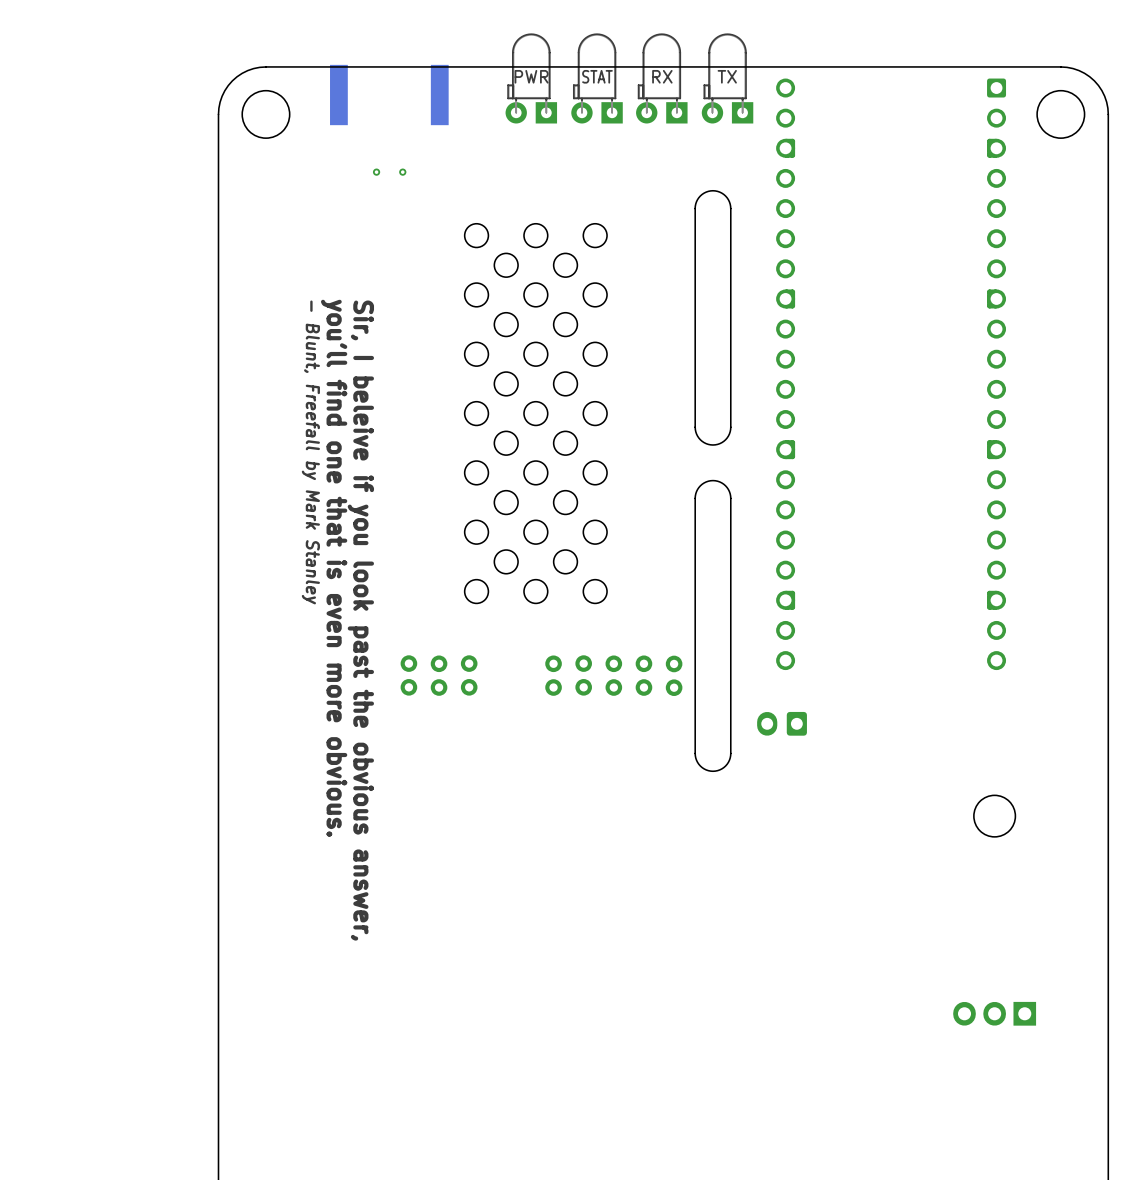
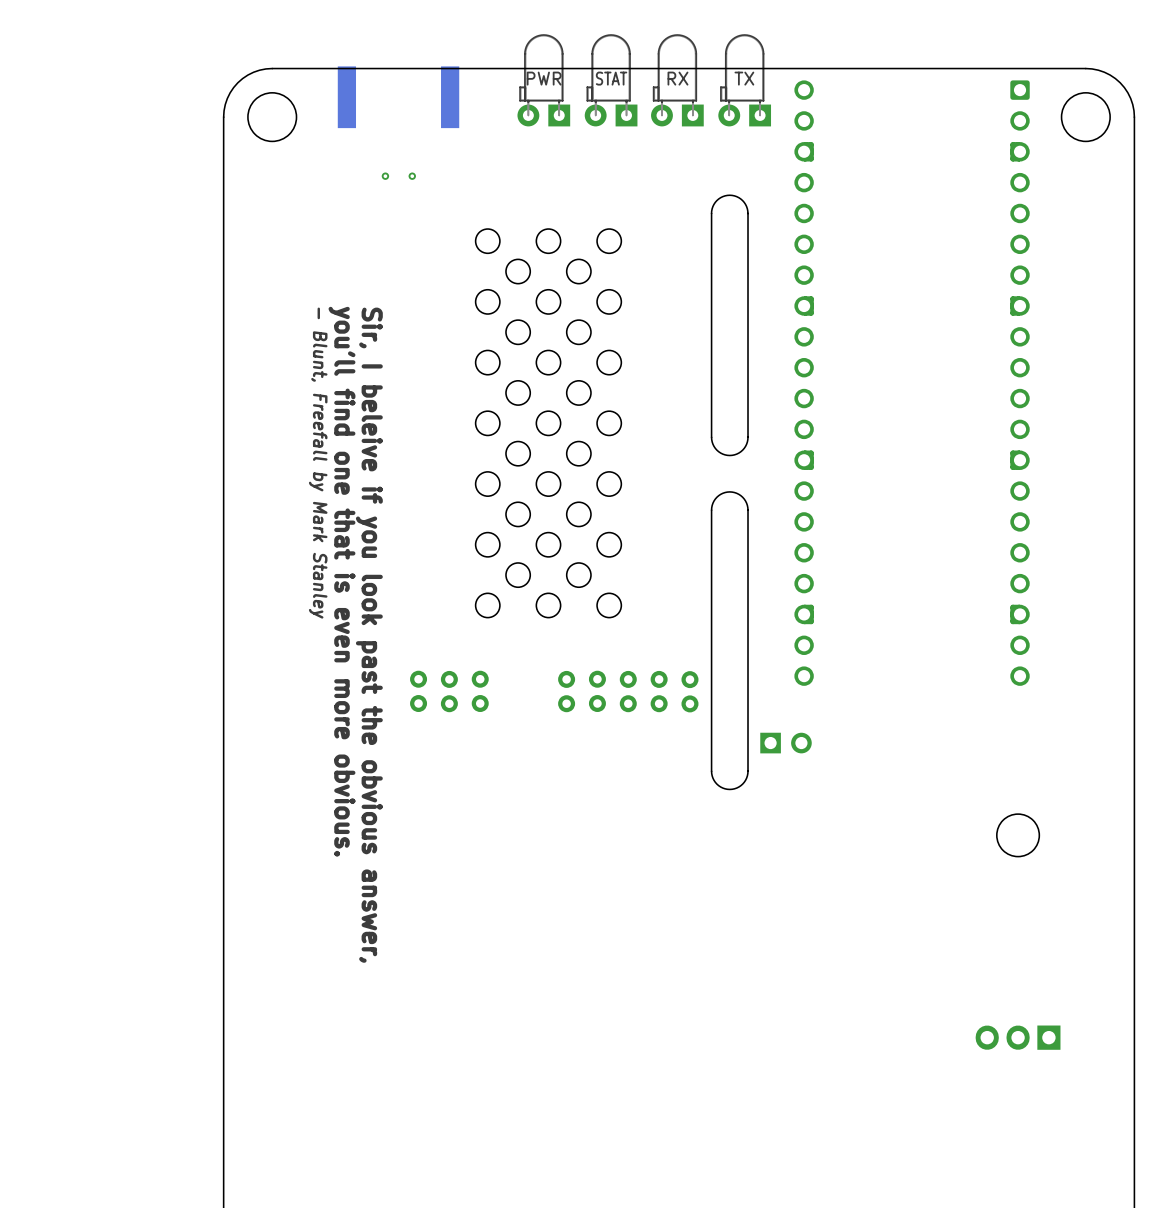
part: (782, 723) -> none
part: none -> (786, 743)

